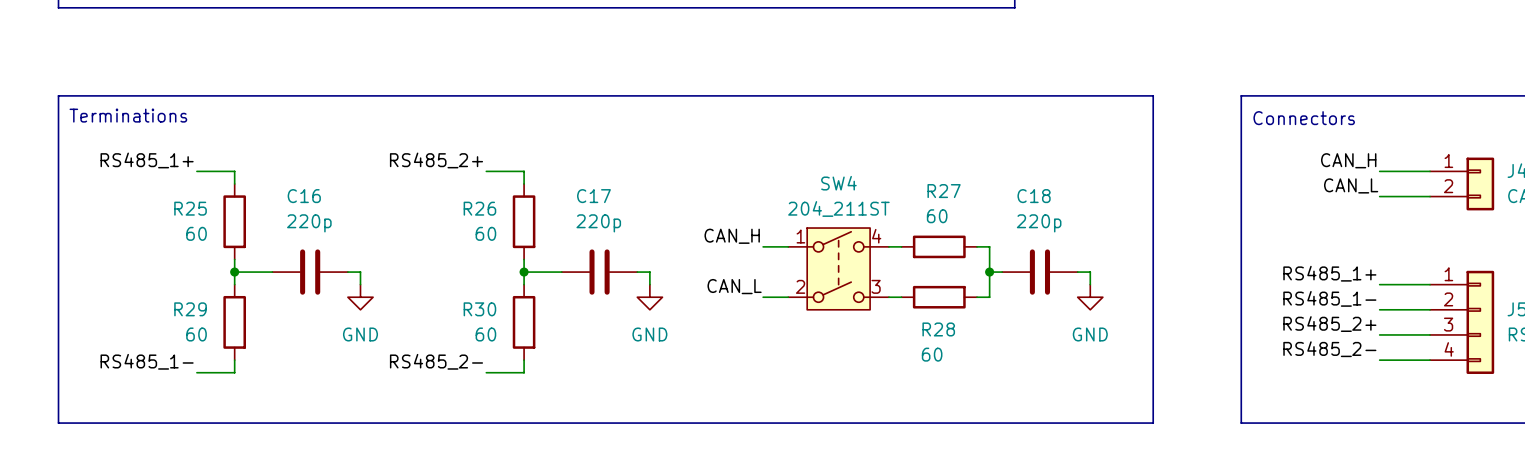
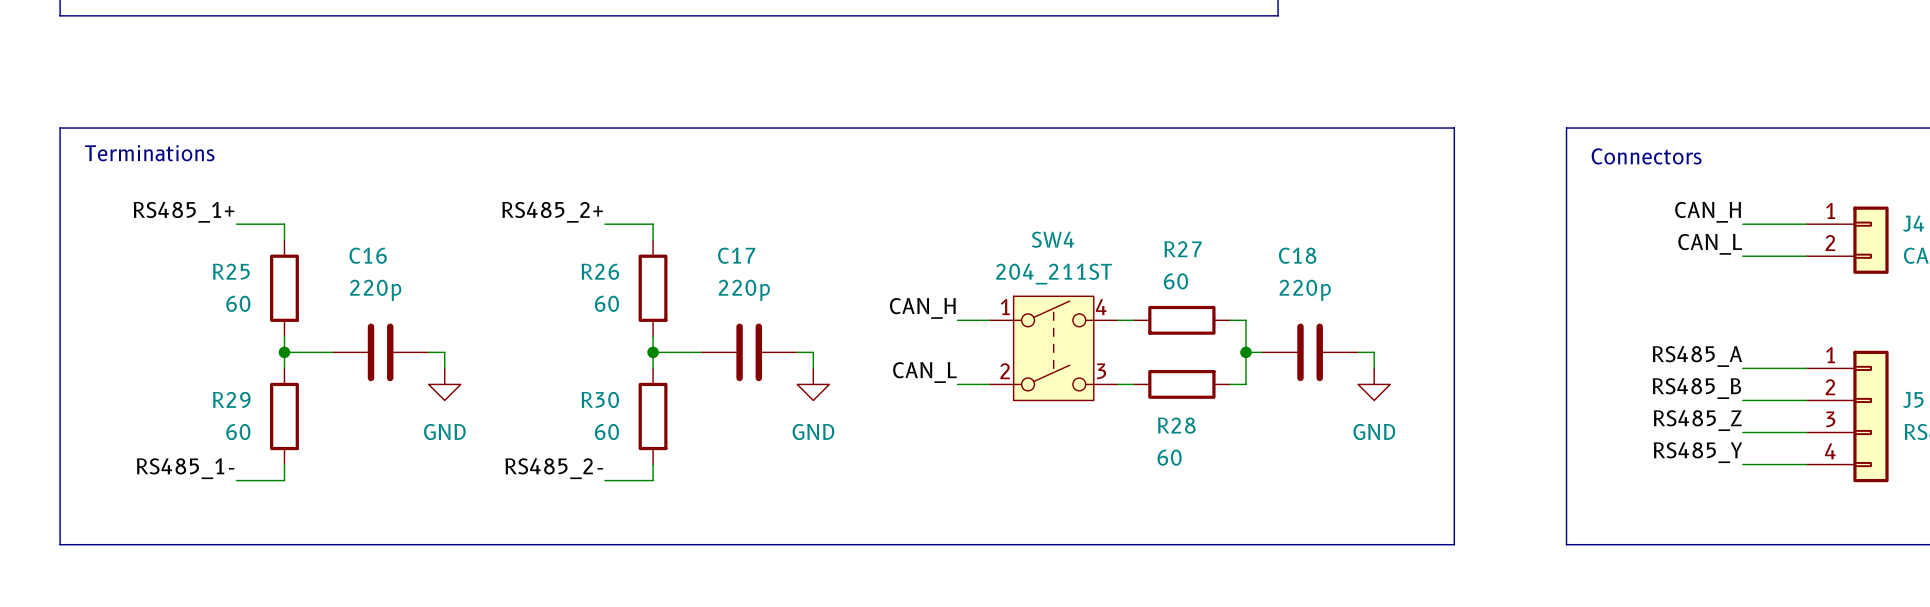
label: RS485_1+ (1329, 273) -> RS485_A (1697, 356)
label: RS485_1- (1329, 298) -> RS485_B (1696, 388)
label: RS485_2+ (1329, 324) -> RS485_Z (1697, 420)
label: RS485_2- (1329, 349) -> RS485_Y (1697, 452)

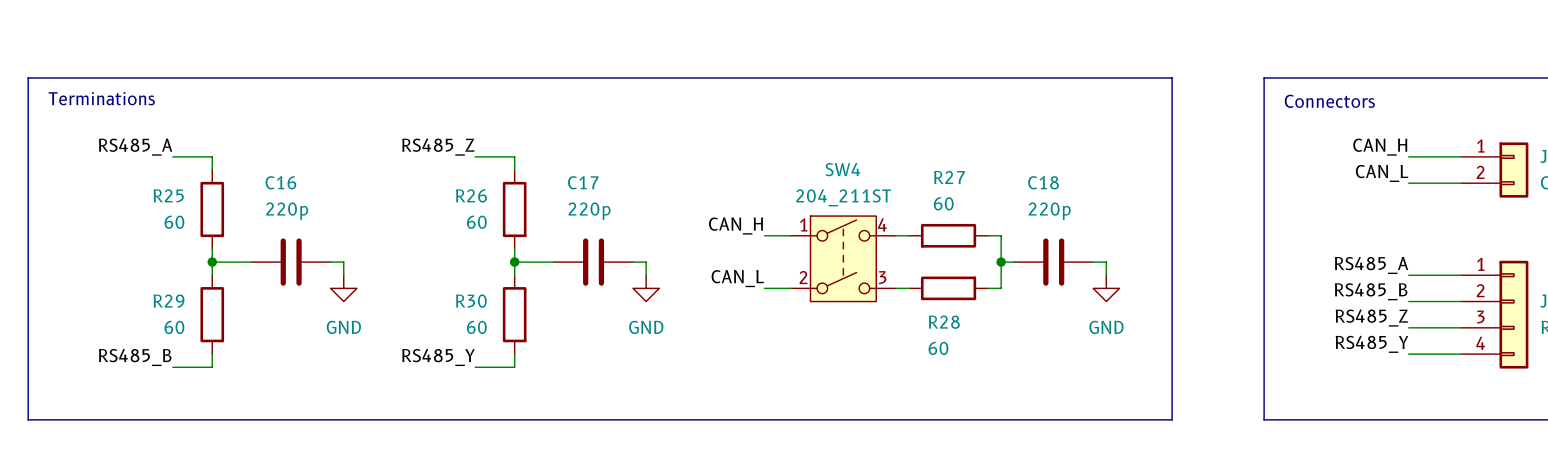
label: RS485_1+ (183, 212) -> RS485_A (135, 147)
label: RS485_2+ (552, 212) -> RS485_Z (438, 147)
label: RS485_1- (185, 468) -> RS485_B (135, 357)
label: RS485_2- (554, 468) -> RS485_Y (438, 357)

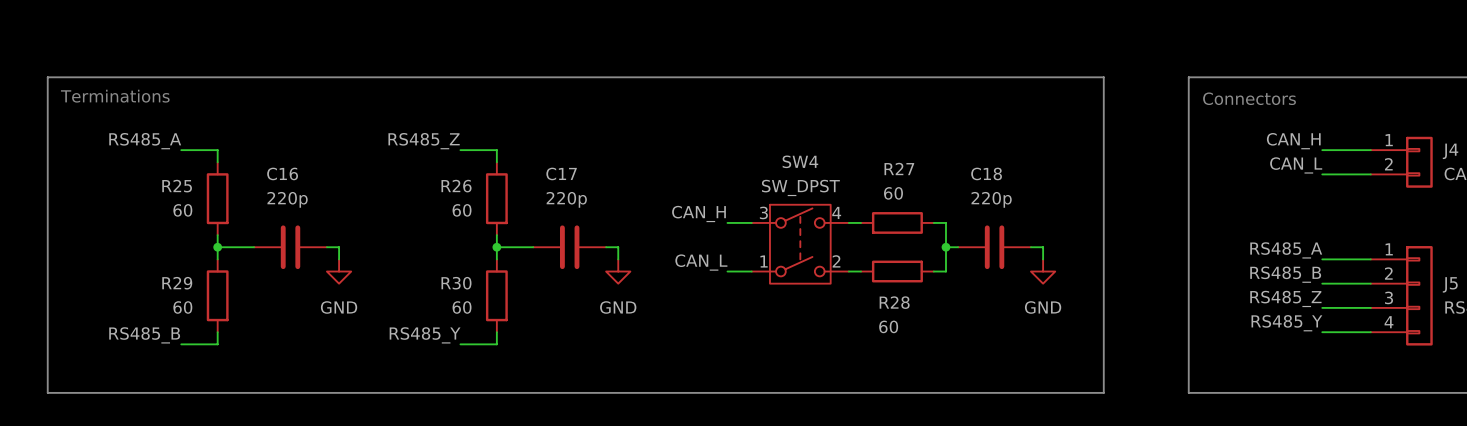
SW4 value: 204_211ST (843, 197) -> SW_DPST (800, 187)
SW4 pin number: 1 (803, 224) -> 3 (763, 212)
SW4 pin number: 2 (803, 277) -> 1 (764, 261)
SW4 pin number: 3 (882, 277) -> 2 (836, 261)

